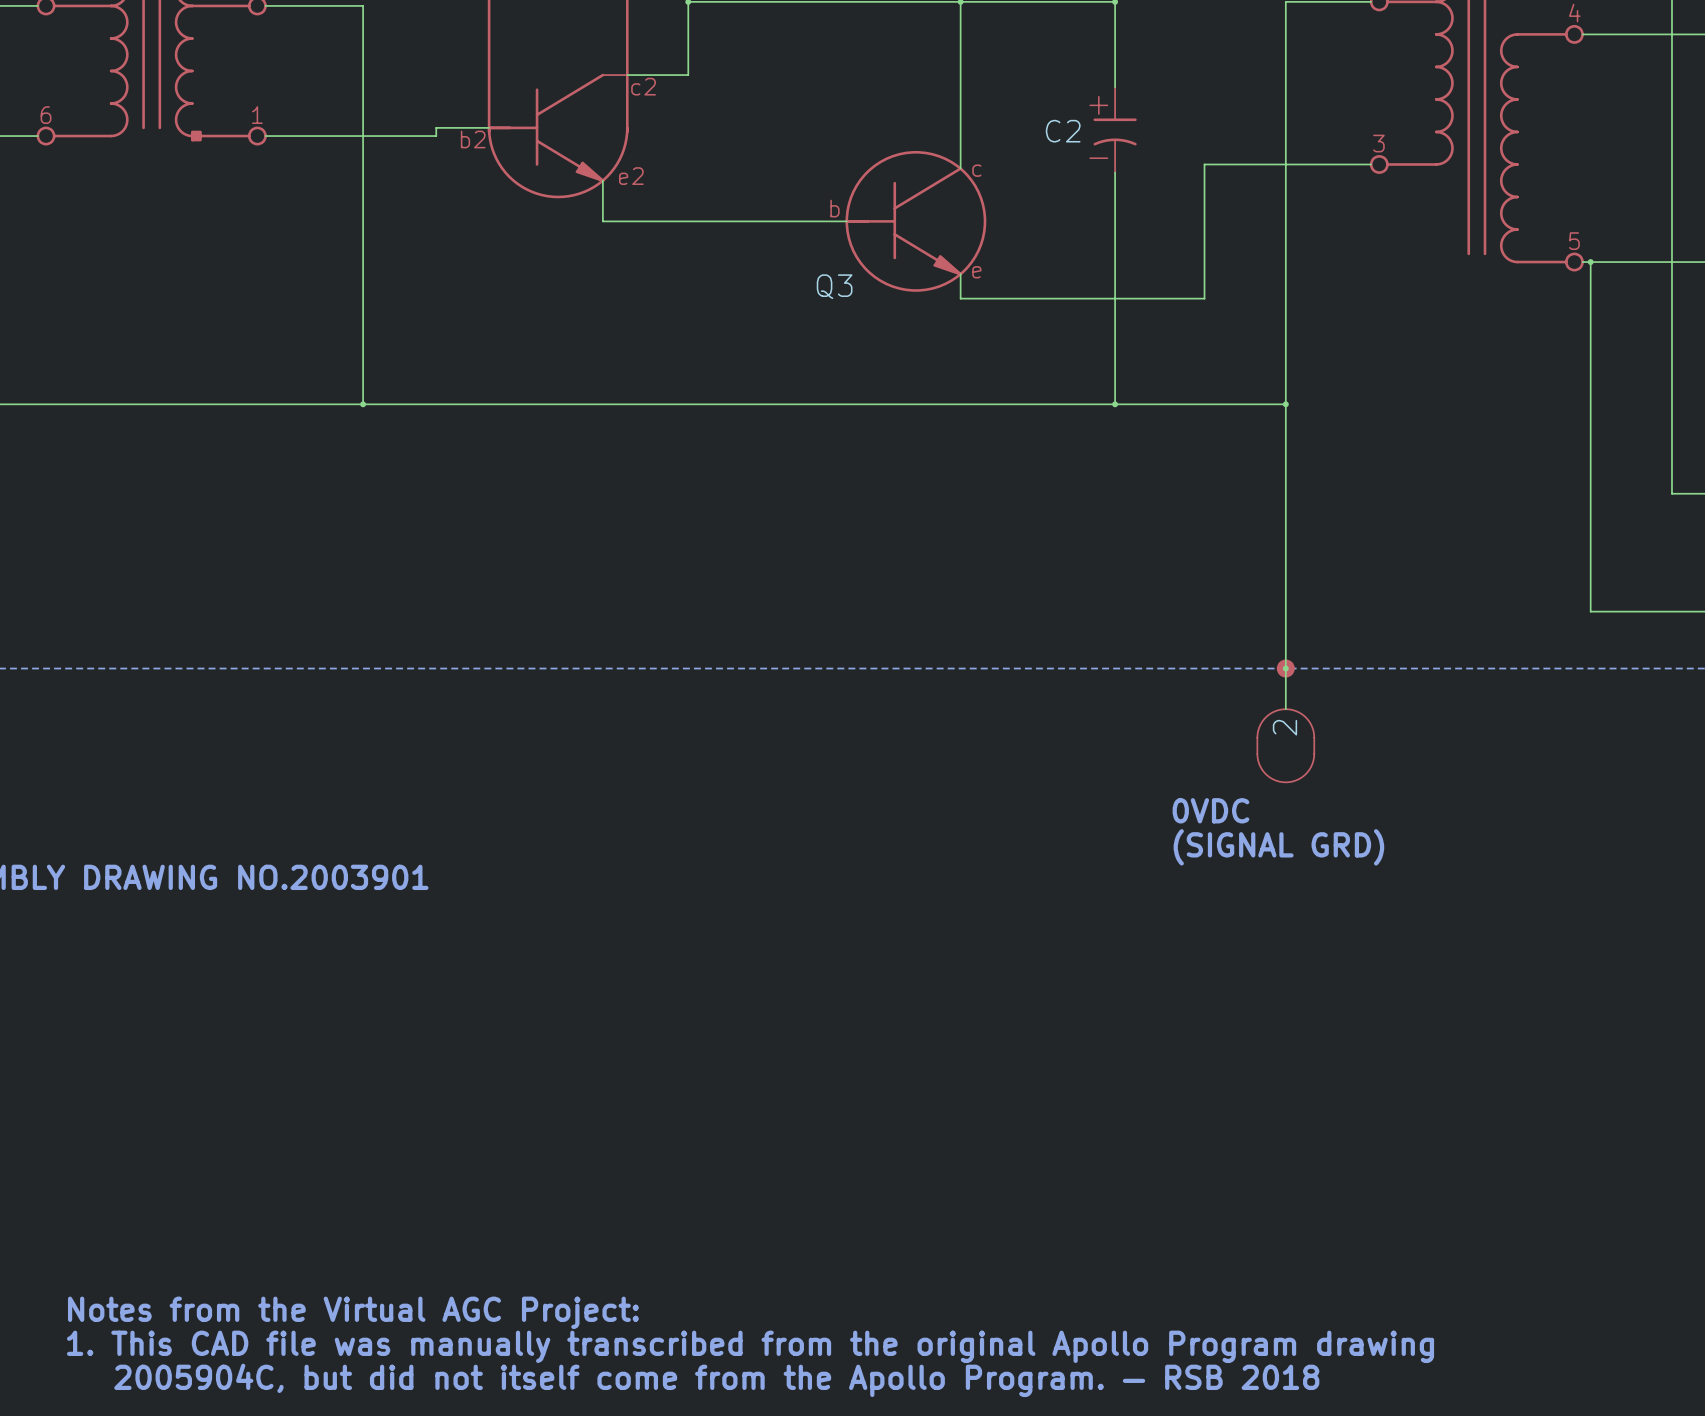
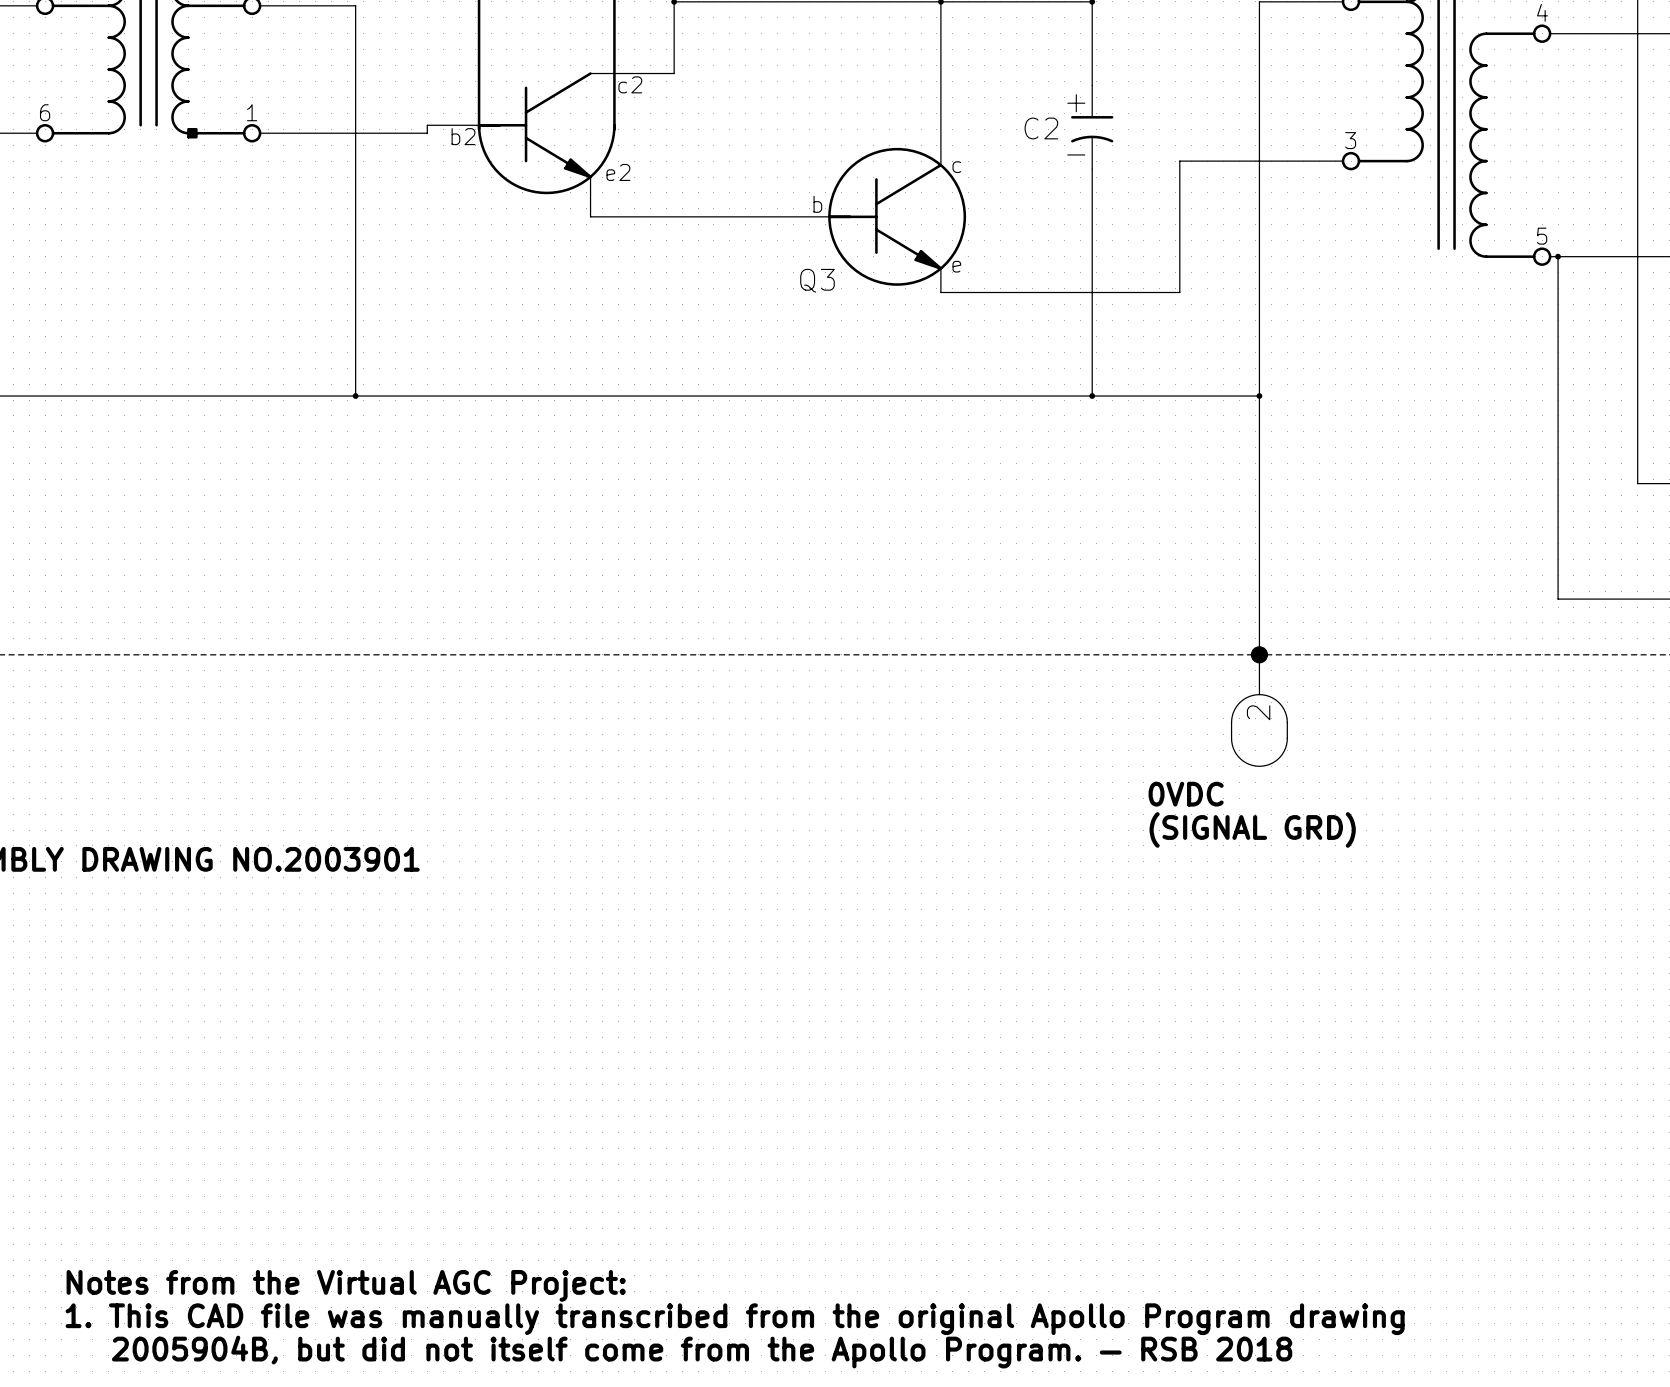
text: 2005904C, but did not itself come from the Apollo Program. — RSB 2018 (716, 1380) -> 2005904B, but did not itself come from the Apollo Program. — RSB 2018 (702, 1352)

